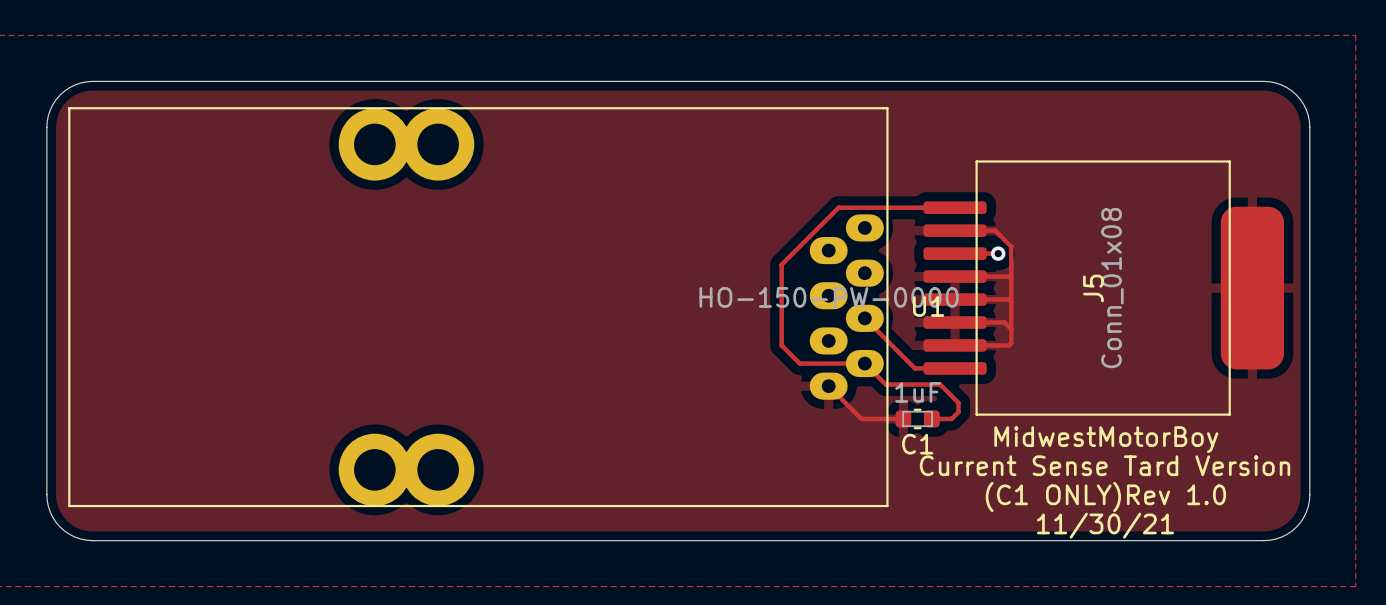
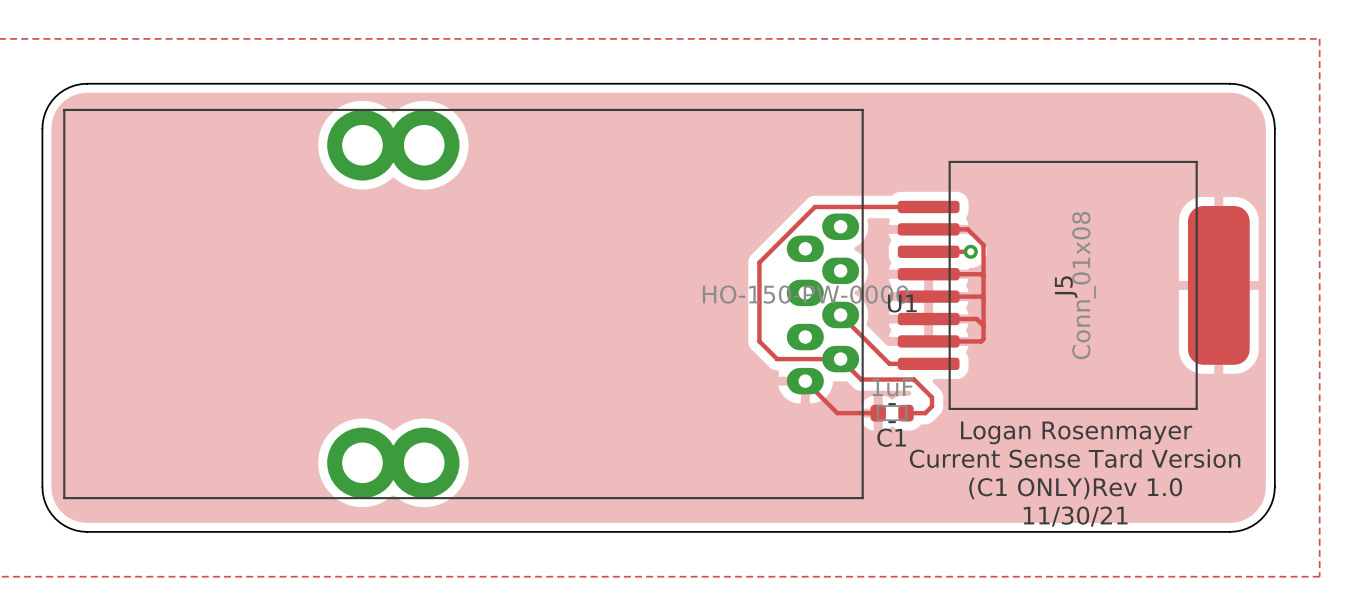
text: MidwestMotorBoy (1106, 439) -> Logan Rosenmayer (1076, 432)

